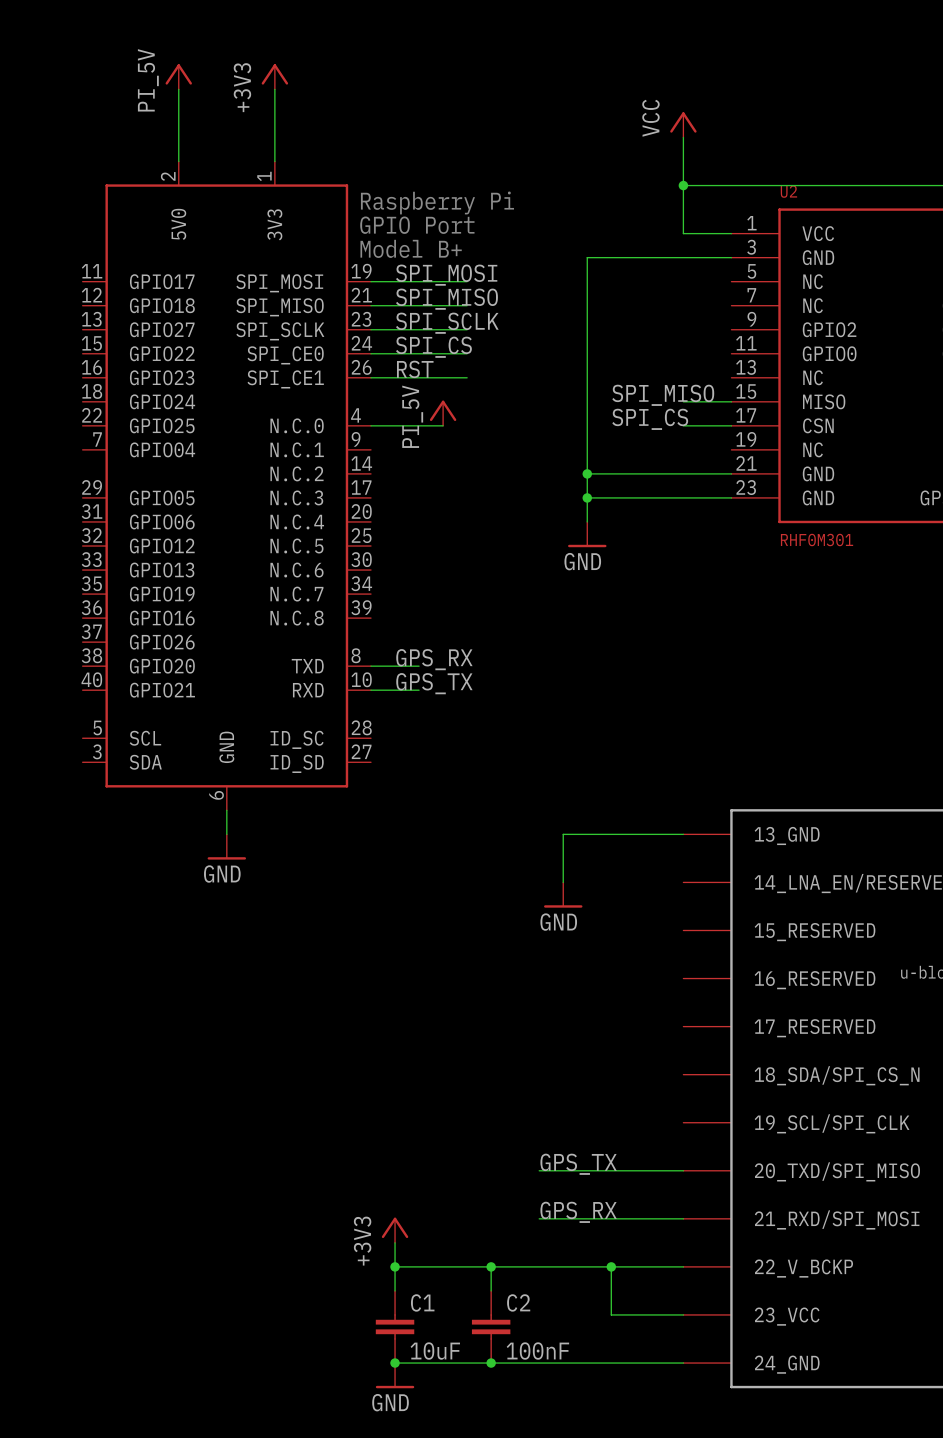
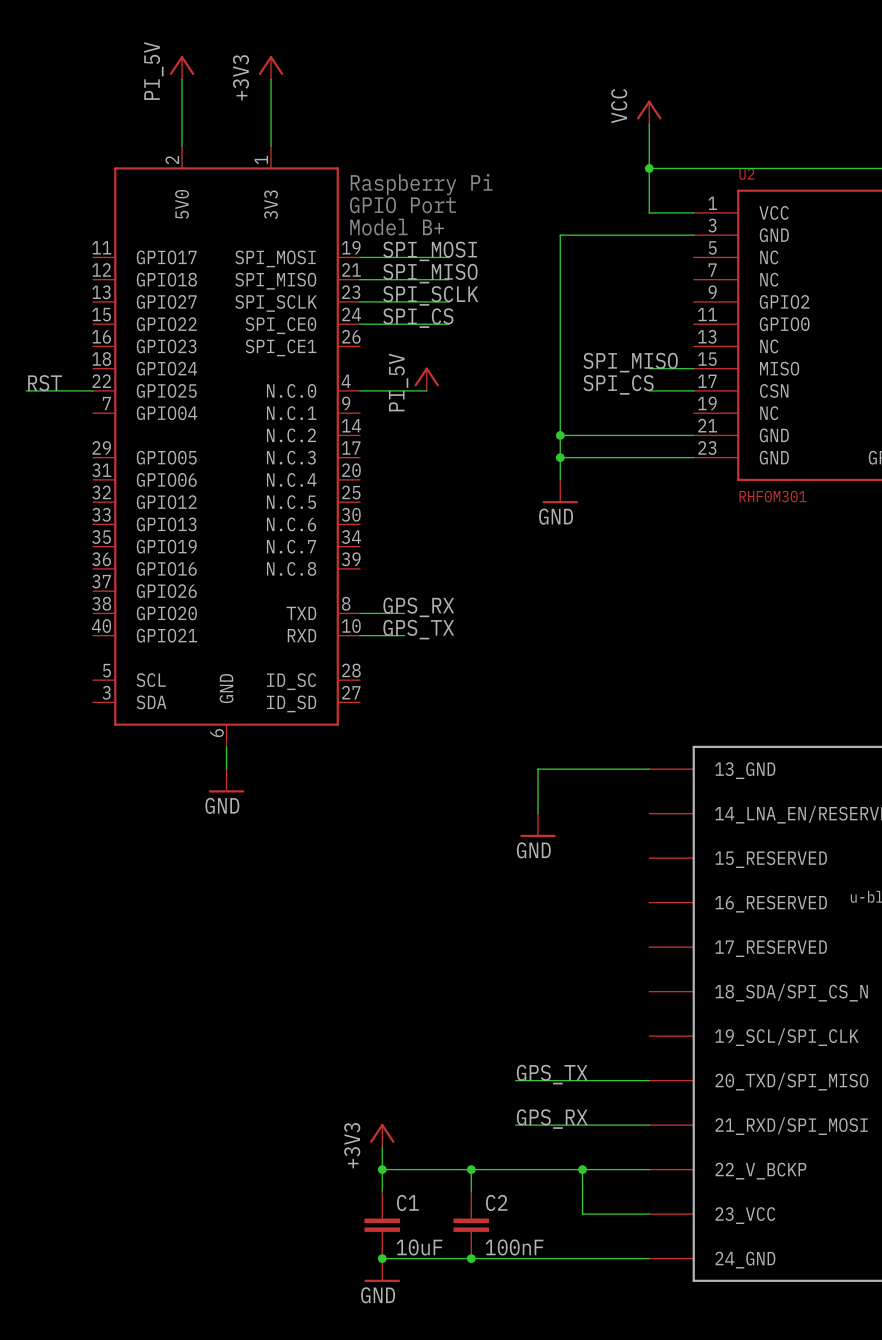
label: RST (415, 369) -> none
wire: (371, 377) (467, 377) -> none
label: none -> RST (45, 383)
wire: none -> (26, 390) (93, 390)

